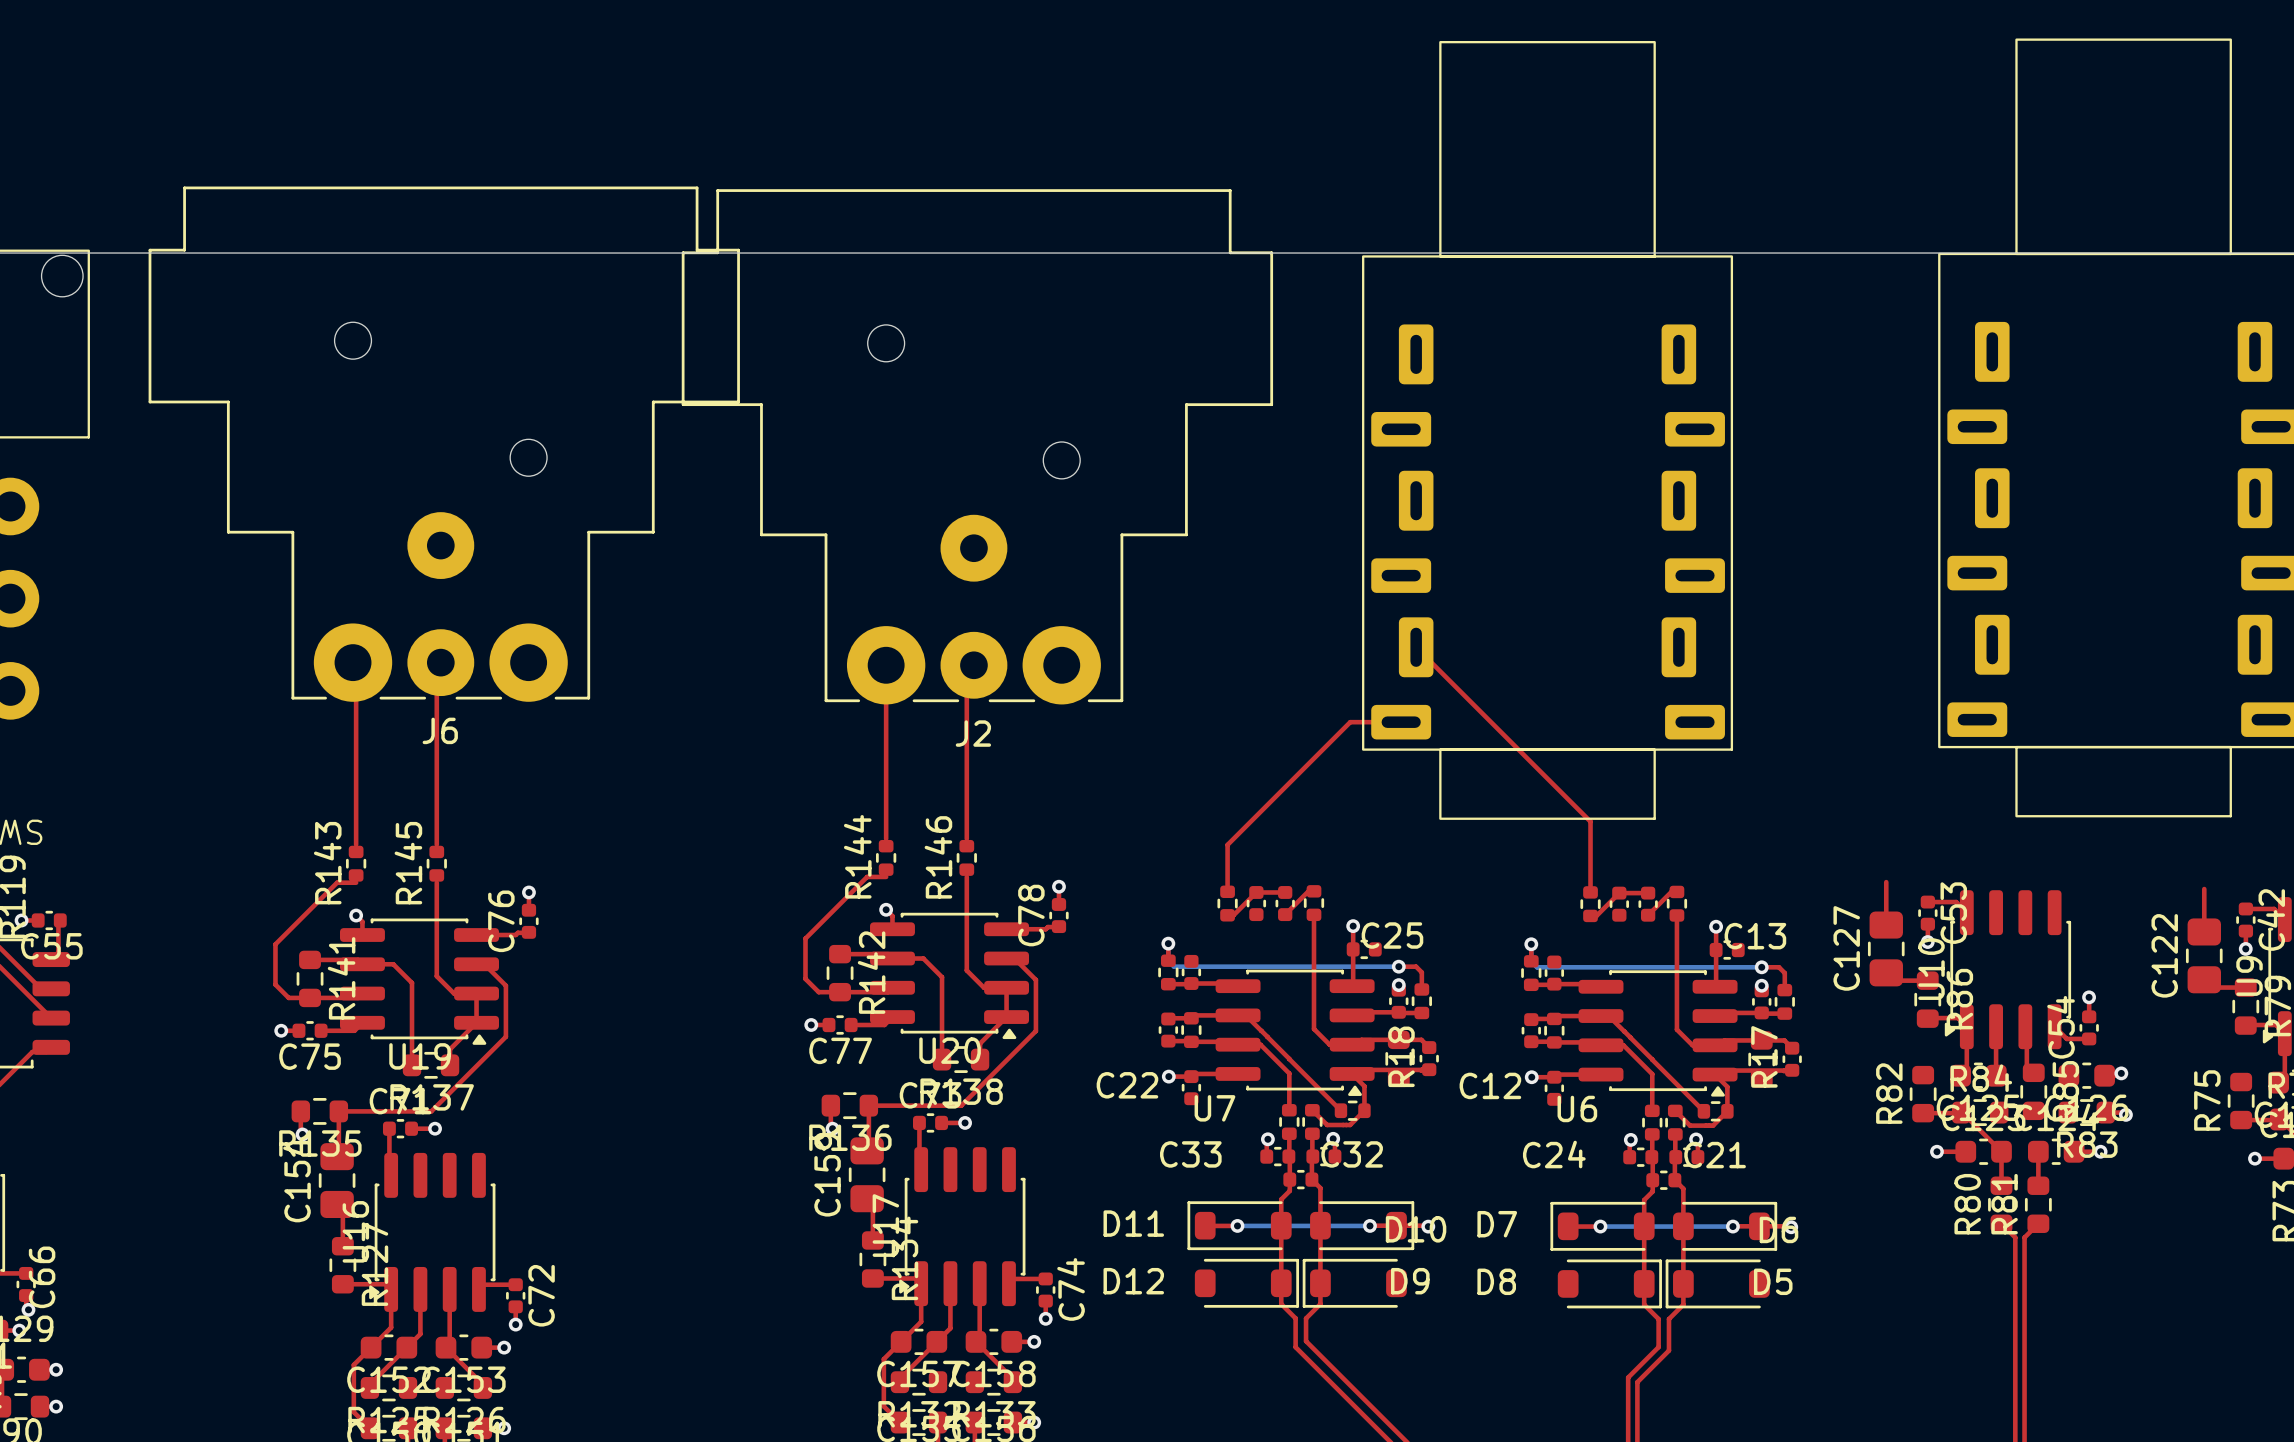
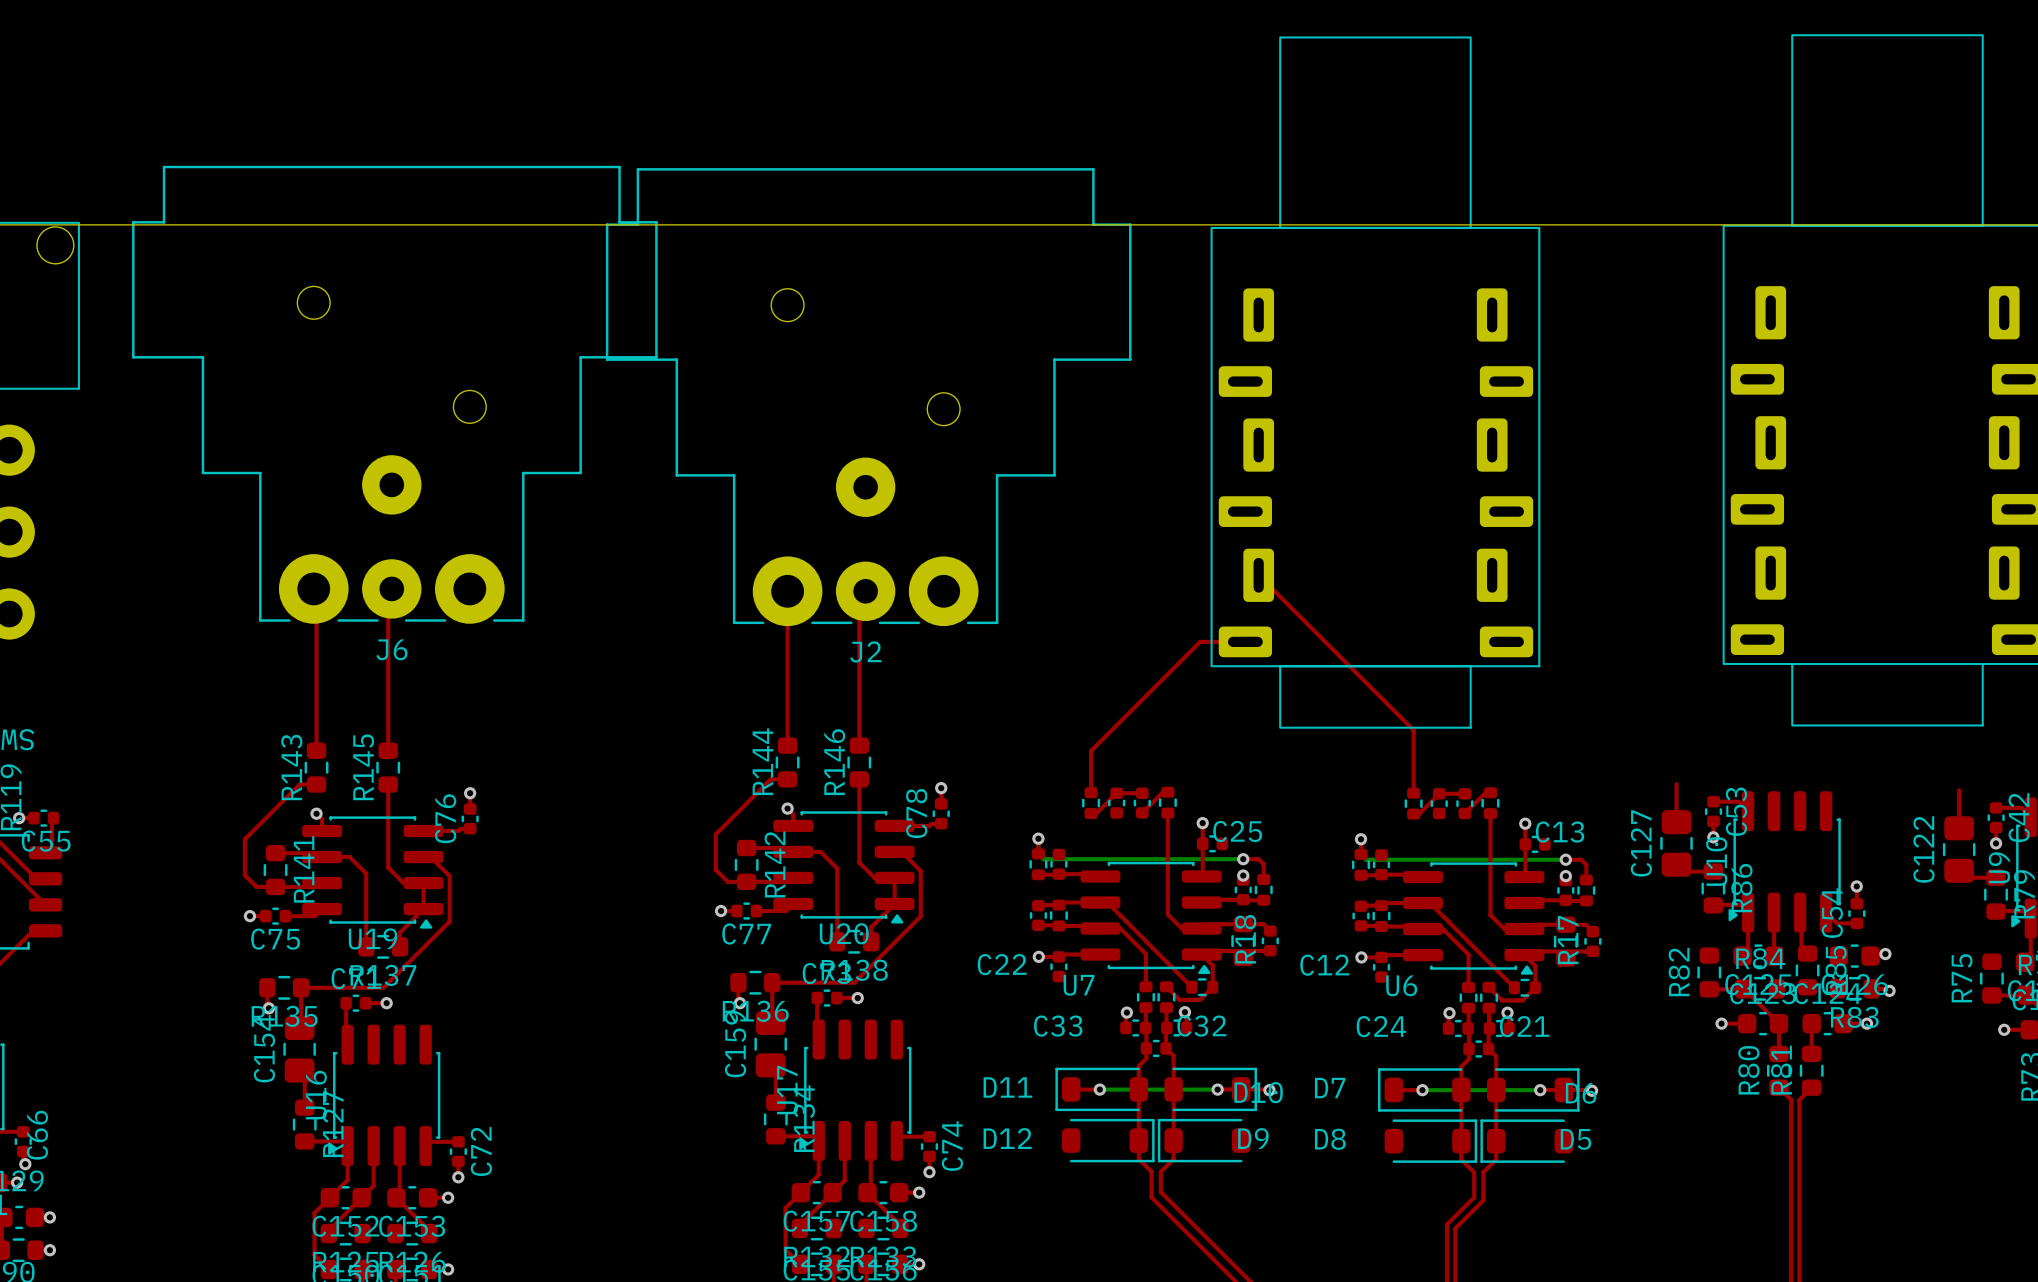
R144 footprint: [876, 839, 897, 876] -> [775, 737, 800, 788]
R146 footprint: [956, 839, 977, 876] -> [847, 737, 872, 788]
R143 footprint: [345, 845, 367, 882] -> [304, 742, 329, 793]
R145 footprint: [426, 845, 447, 882] -> [376, 742, 401, 793]

